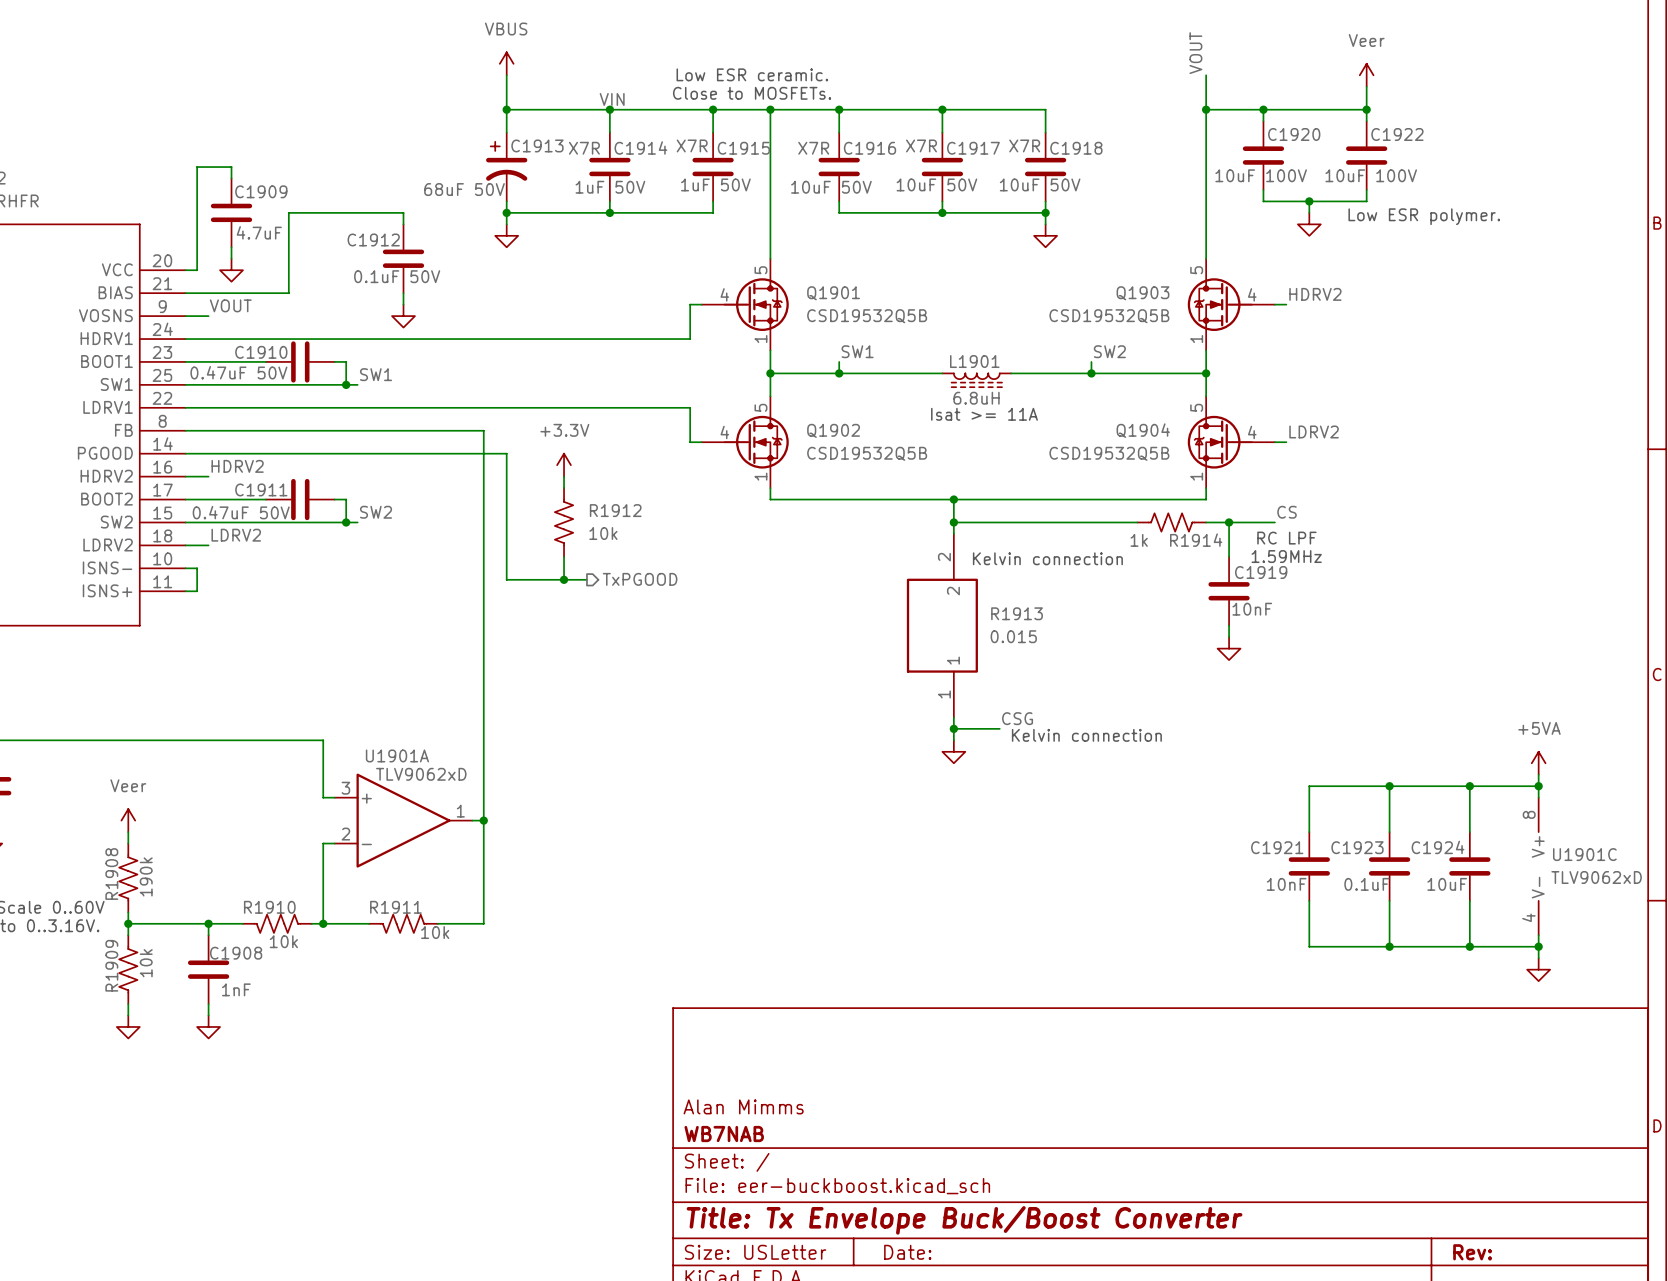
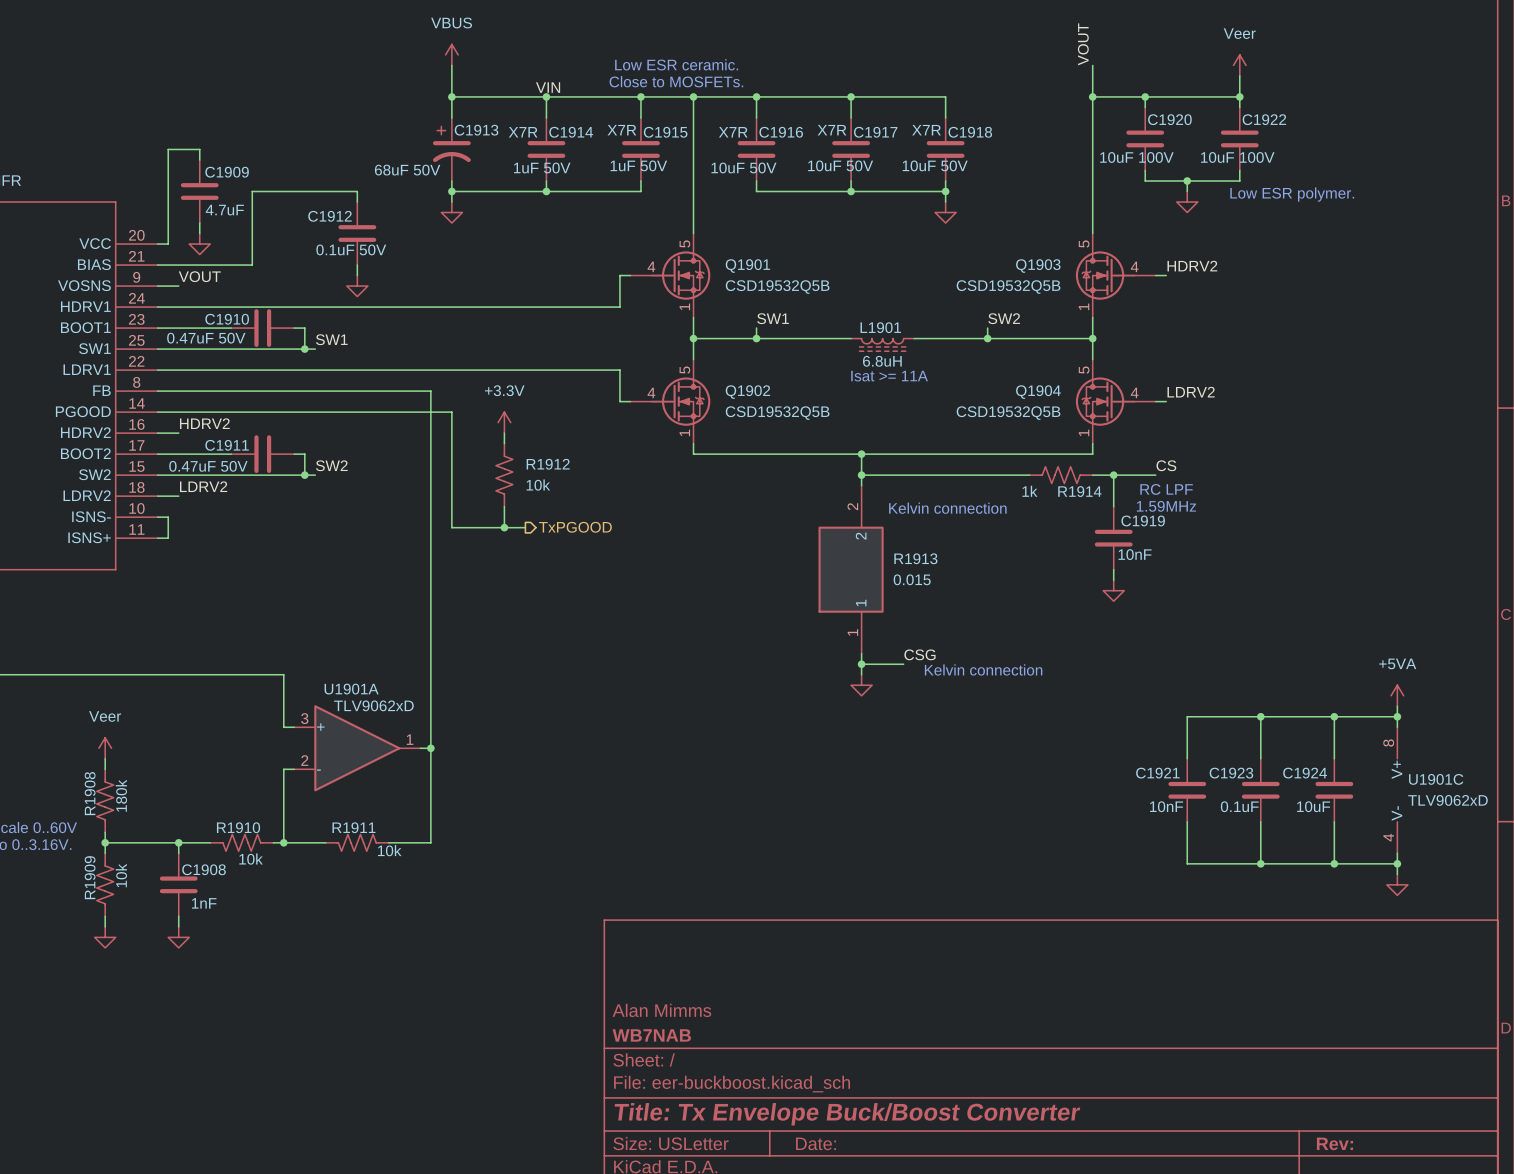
R1908 value: 190k (146, 876) -> 180k (121, 795)

